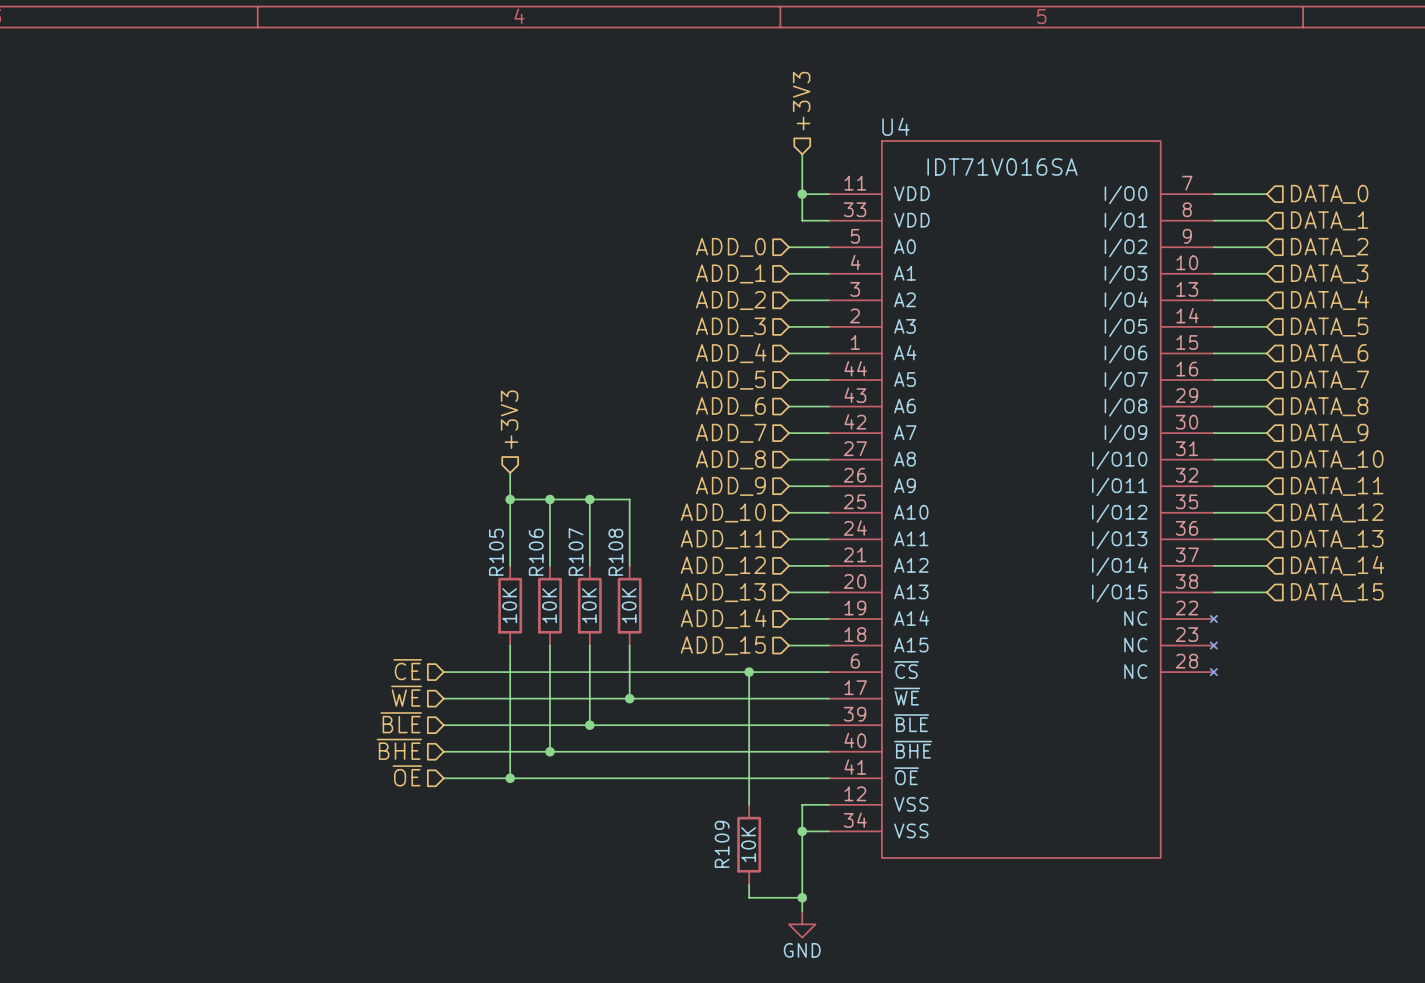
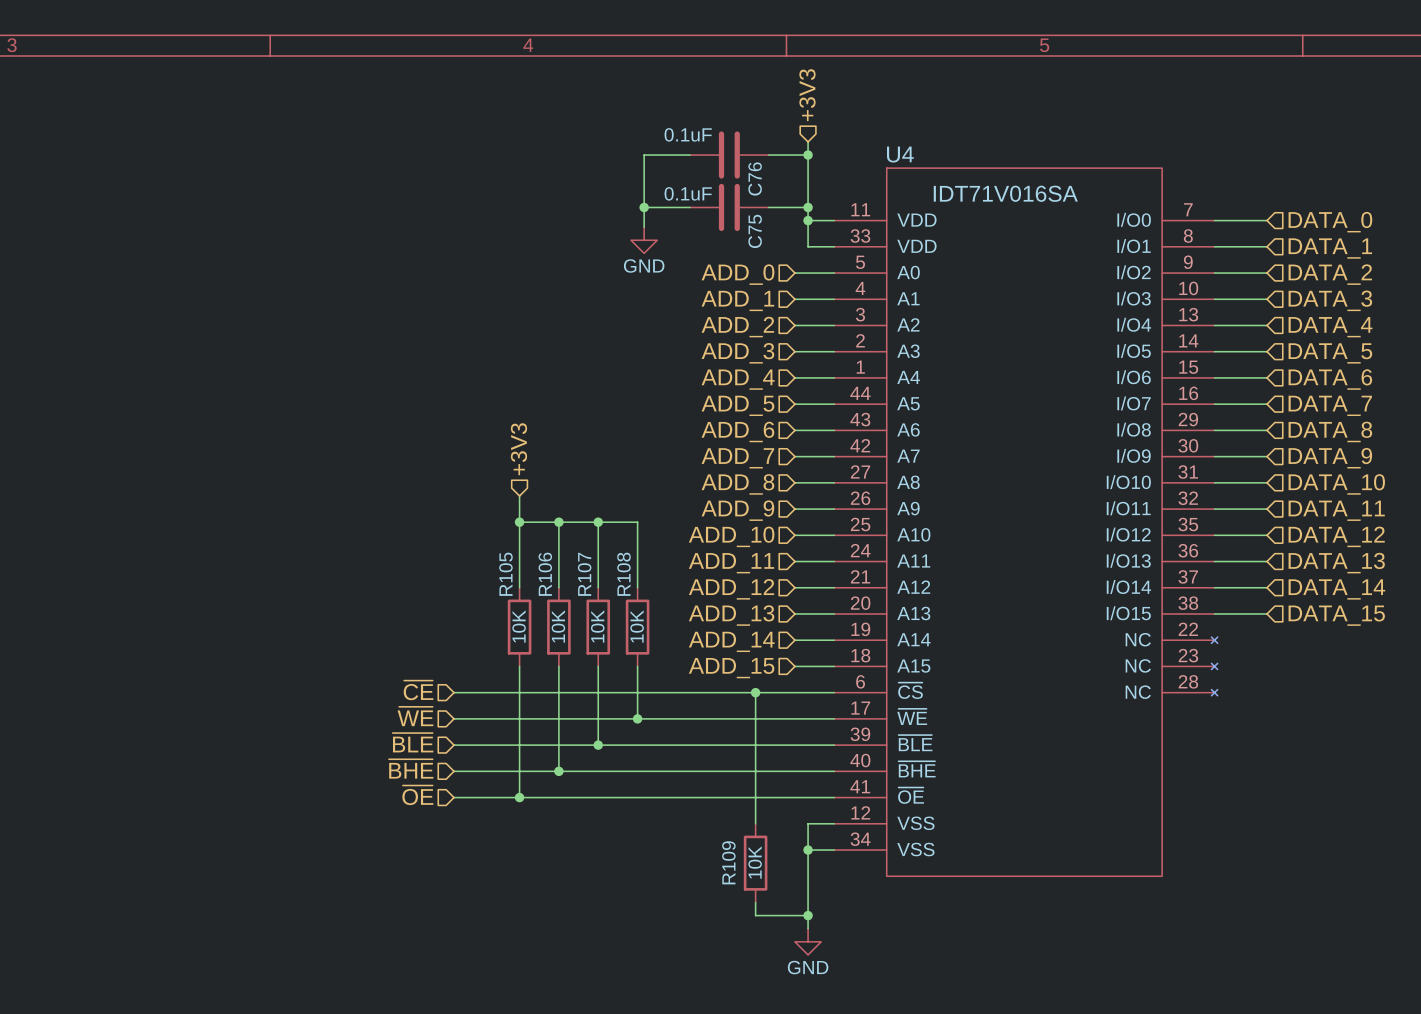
hierarchical label position: +3V3 (801, 101) -> +3V3 (807, 95)
wire: none -> (808, 141) (808, 181)
wire: none -> (690, 155) (644, 155) (644, 227)
C76: none -> 0.1uF (729, 155)
wire: none -> (768, 155) (808, 155)
junction: none -> (808, 155)
wire: none -> (644, 207) (690, 207)
junction: none -> (644, 207)
C75: none -> 0.1uF (729, 207)
wire: none -> (768, 207) (808, 207)
junction: none -> (808, 207)
power symbol: none -> GND (644, 240)

